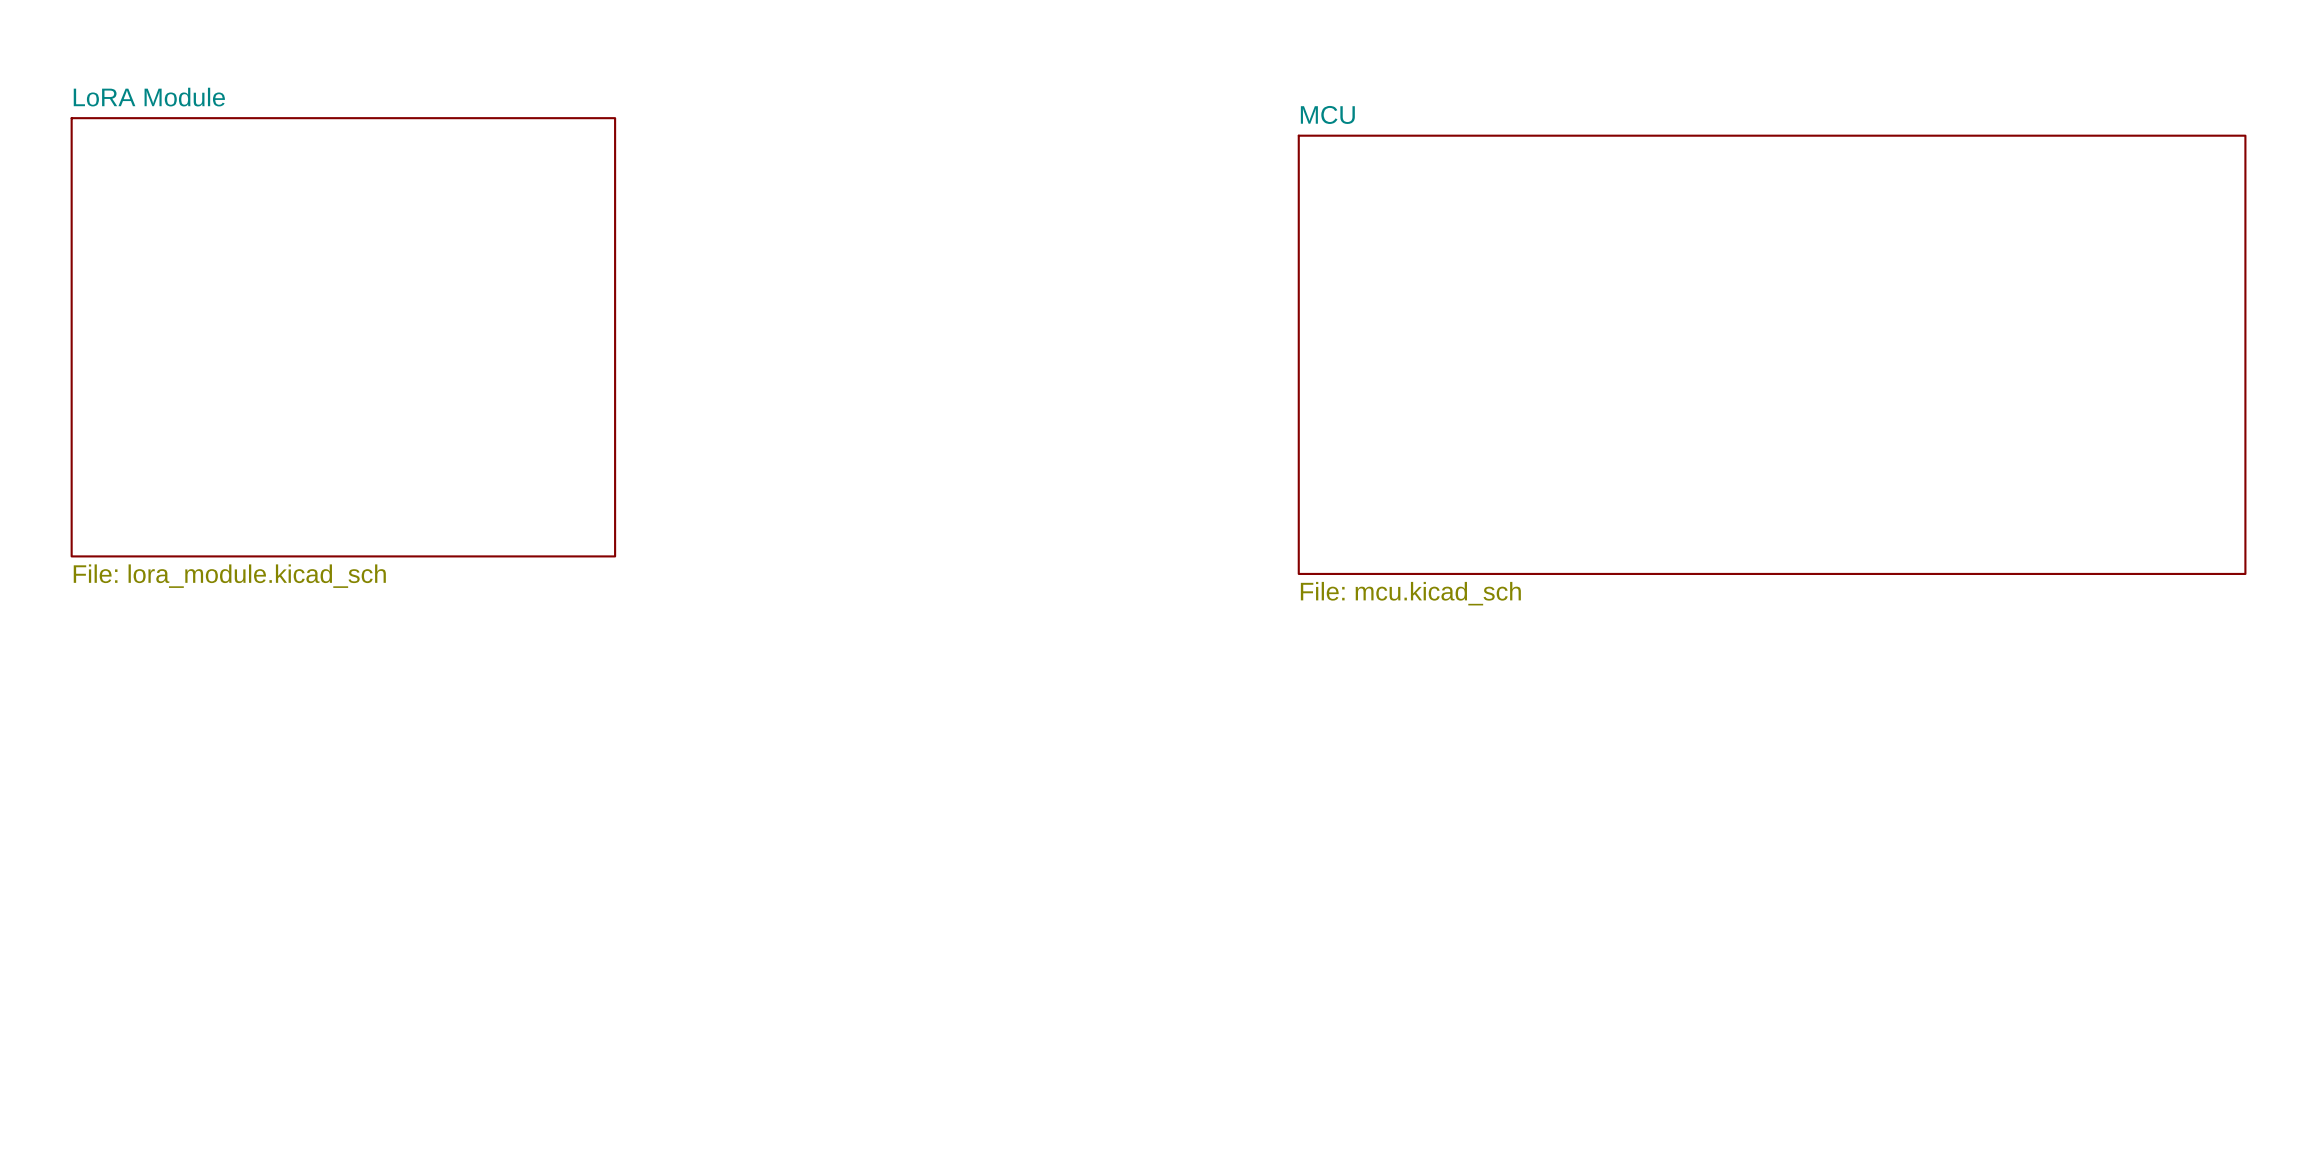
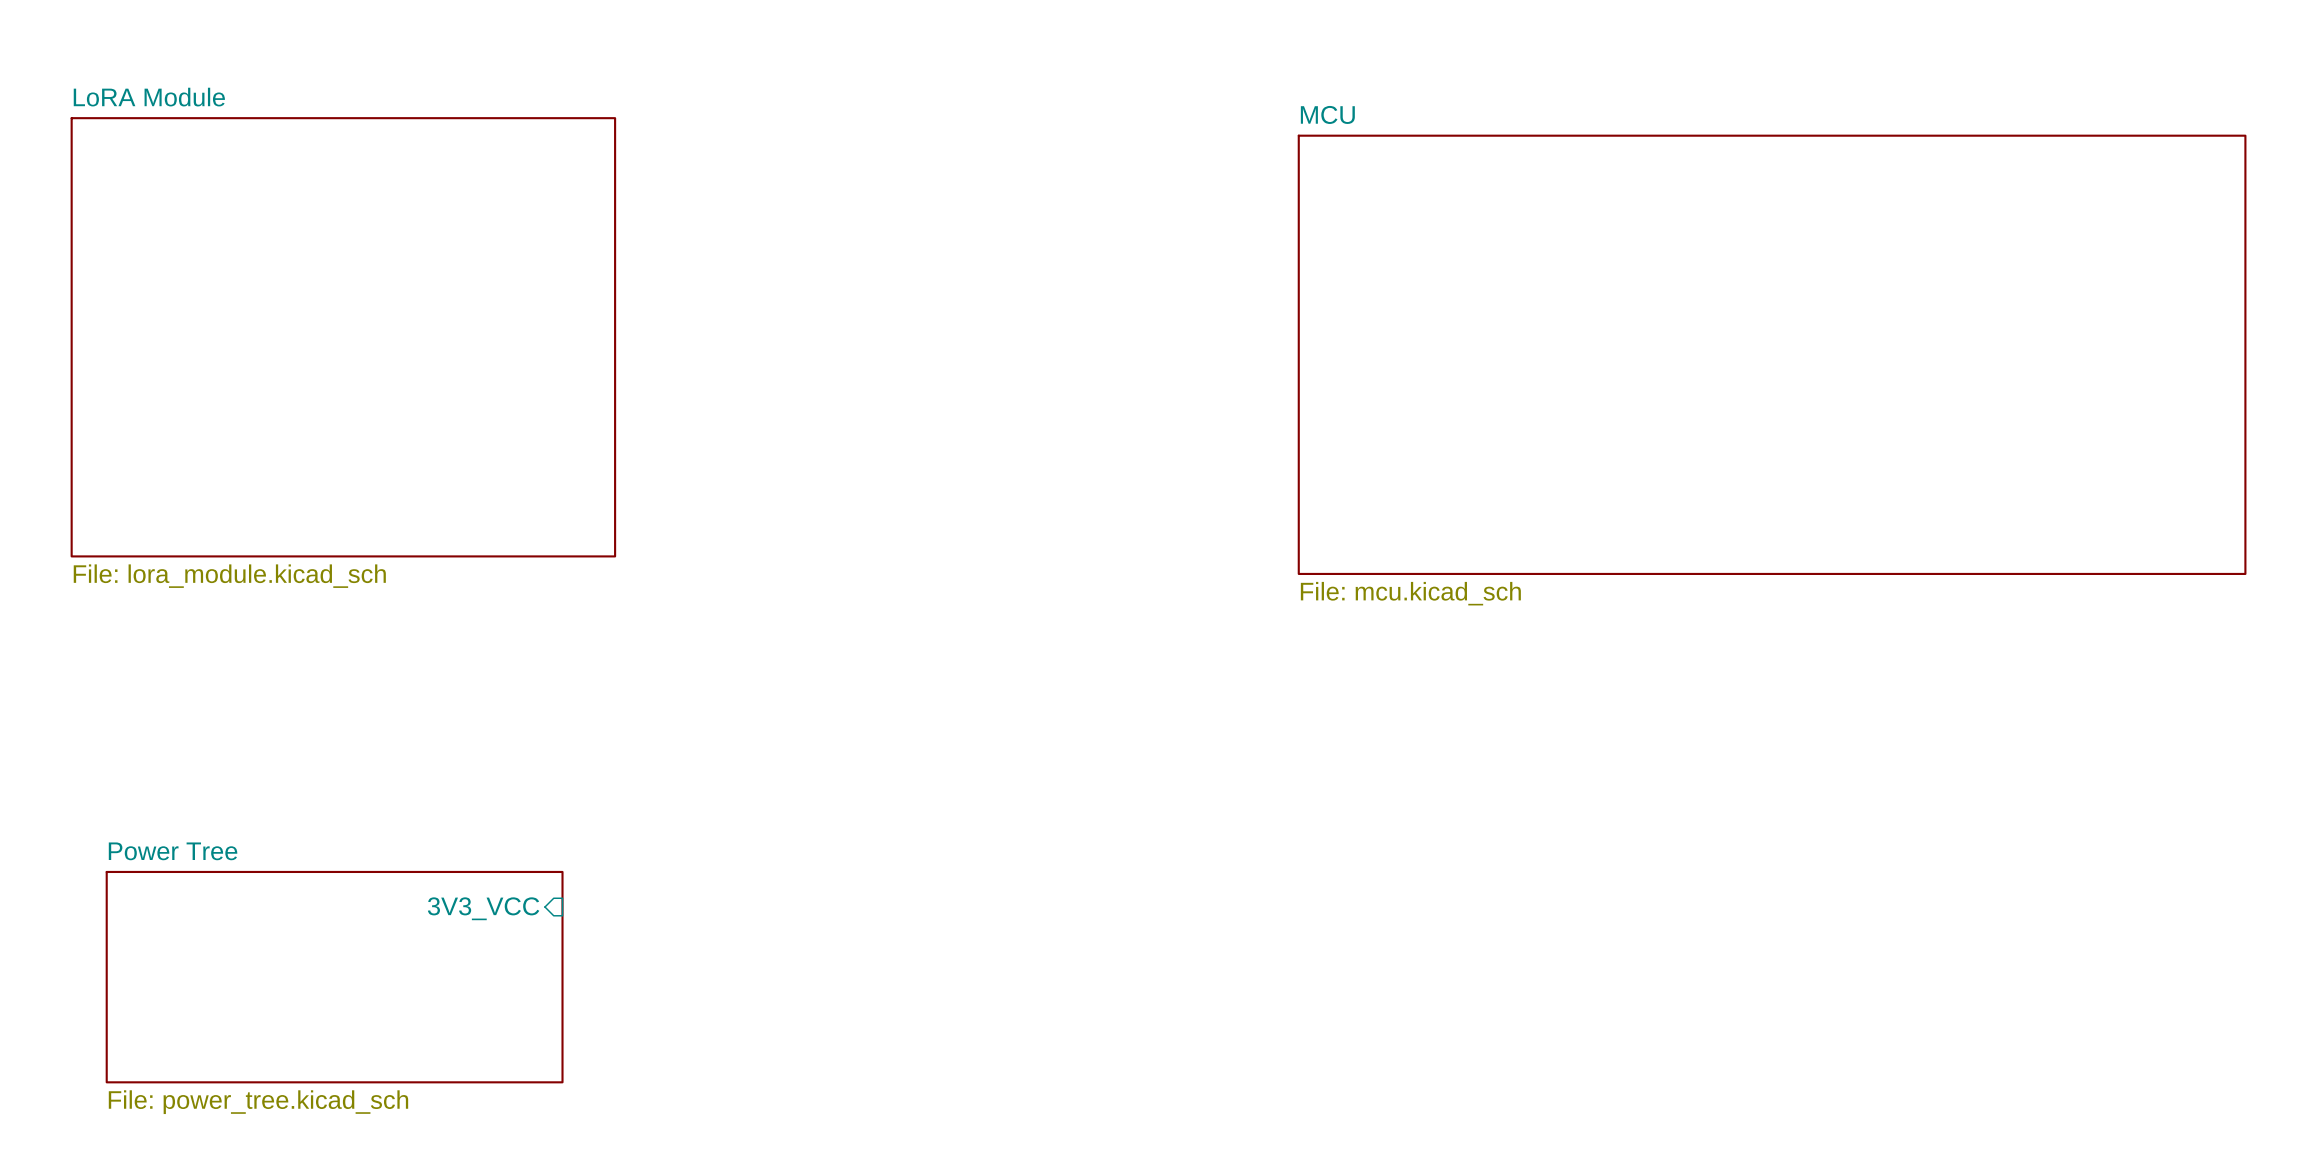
sheet pin: none -> 3V3_VCC (483, 908)
sheet Power Tree: none -> File: power_tree.kicad_sch (334, 977)

